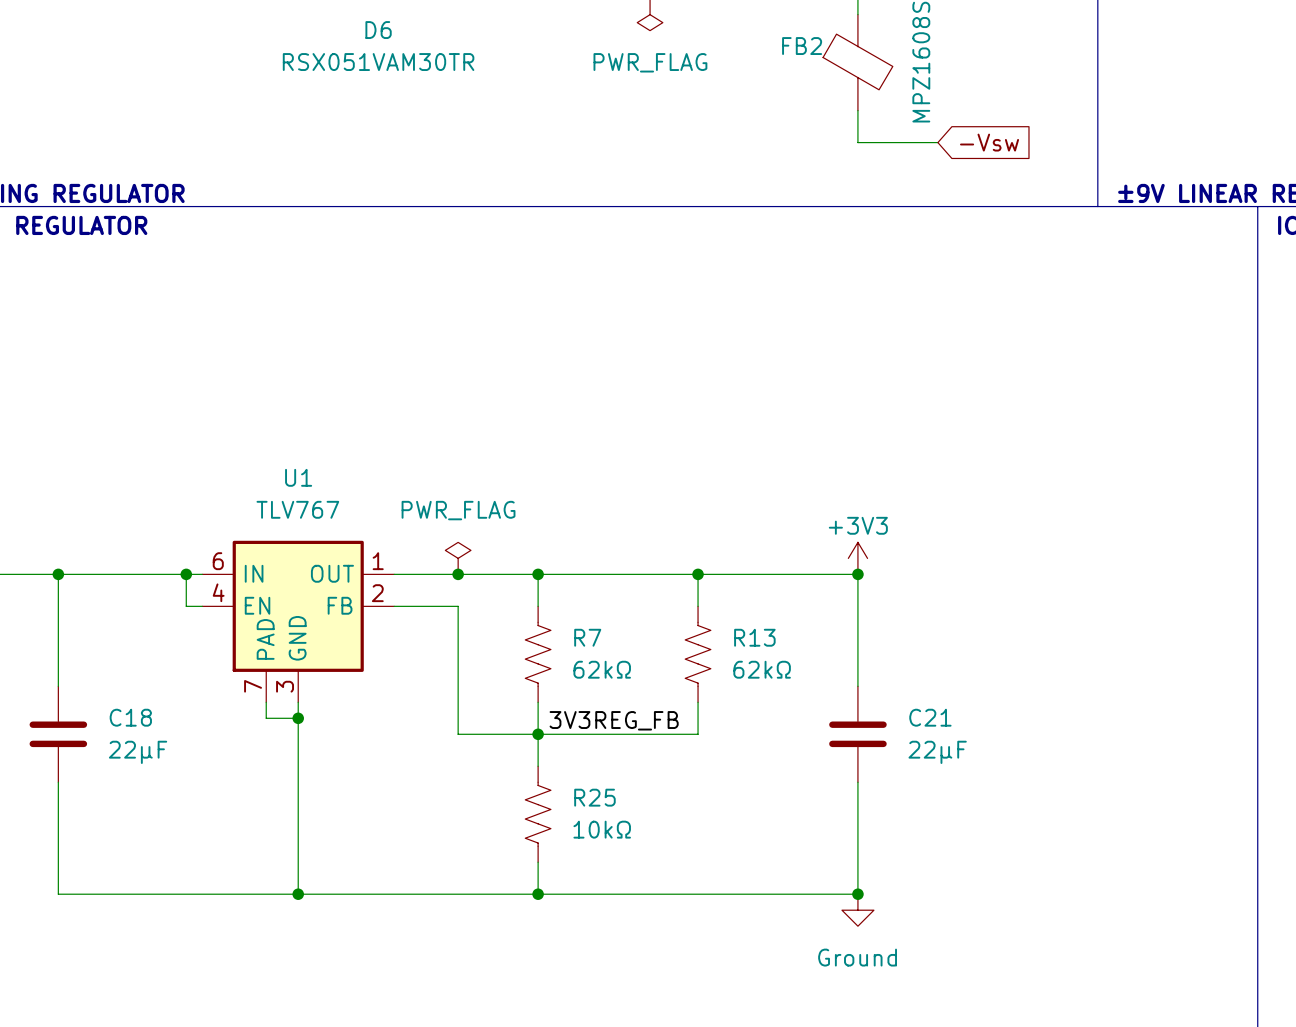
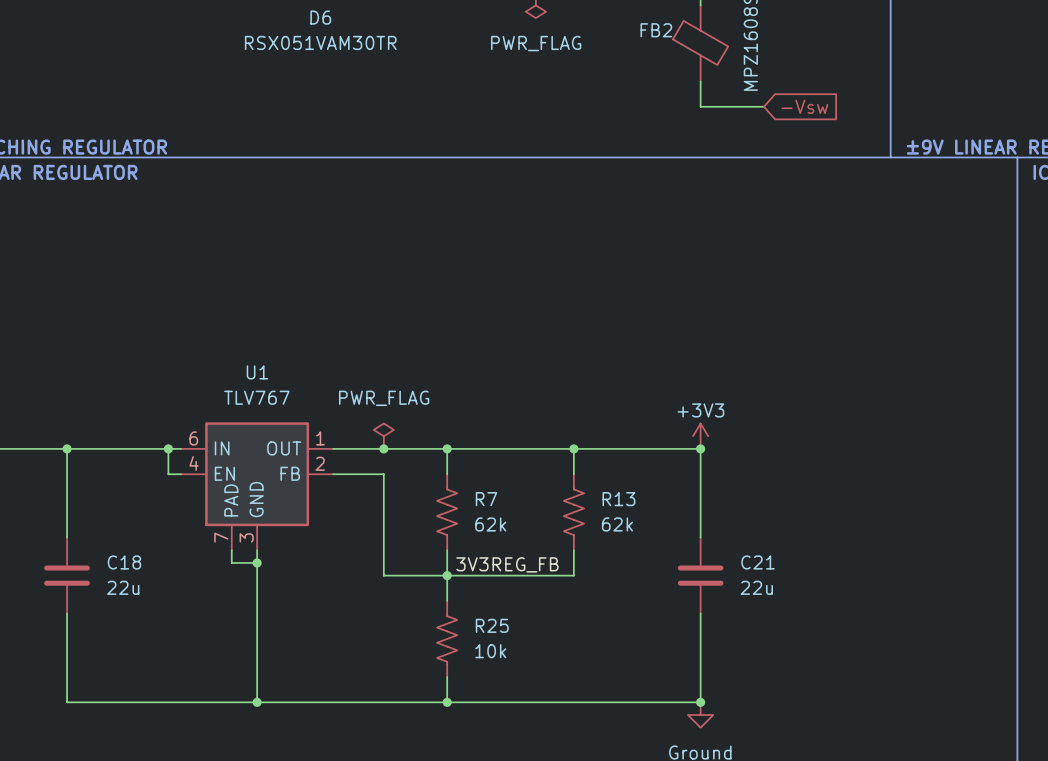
R7 value: 62kΩ (602, 669) -> 62k (490, 524)
R13 value: 62kΩ (762, 669) -> 62k (617, 524)
C18 value: 22μF (138, 752) -> 22u (123, 587)
C21 value: 22μF (937, 752) -> 22u (756, 587)
R25 value: 10kΩ (602, 829) -> 10k (490, 651)

